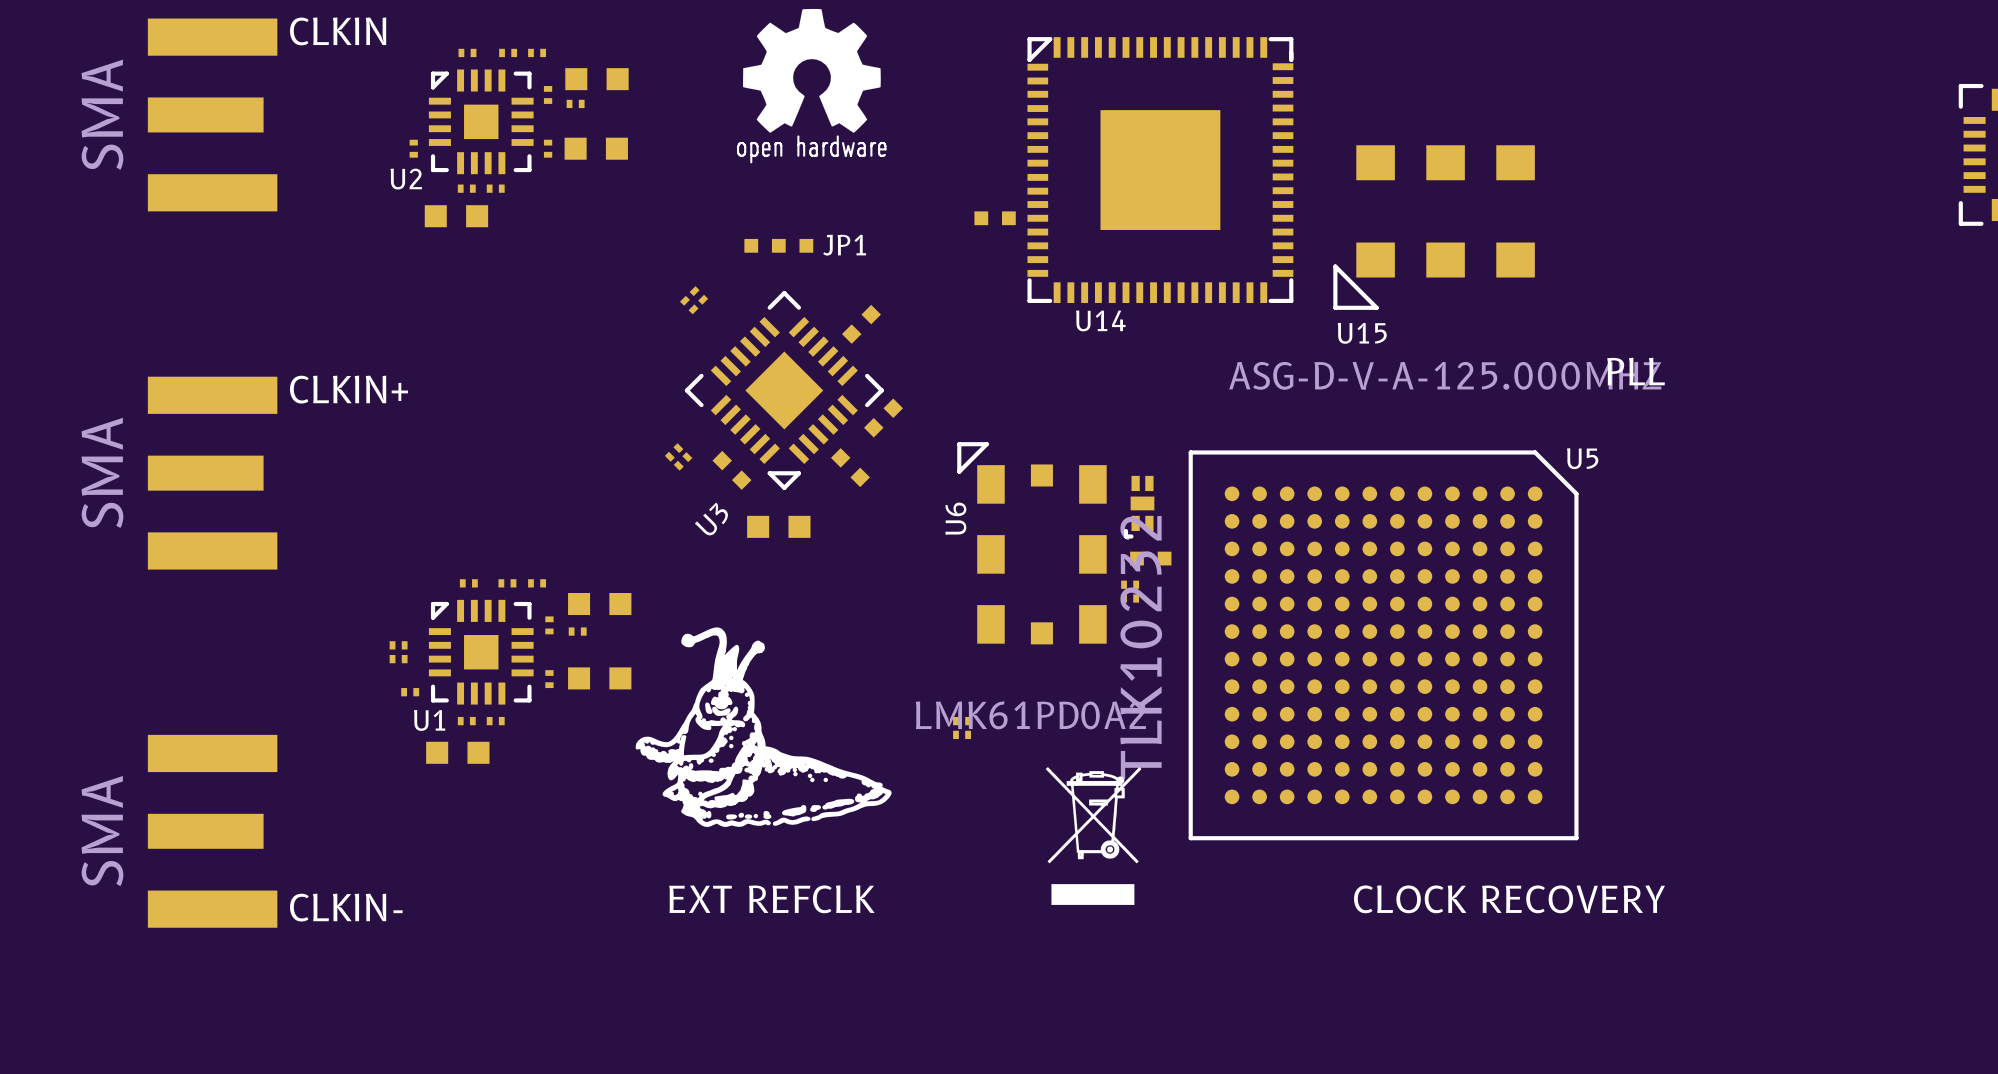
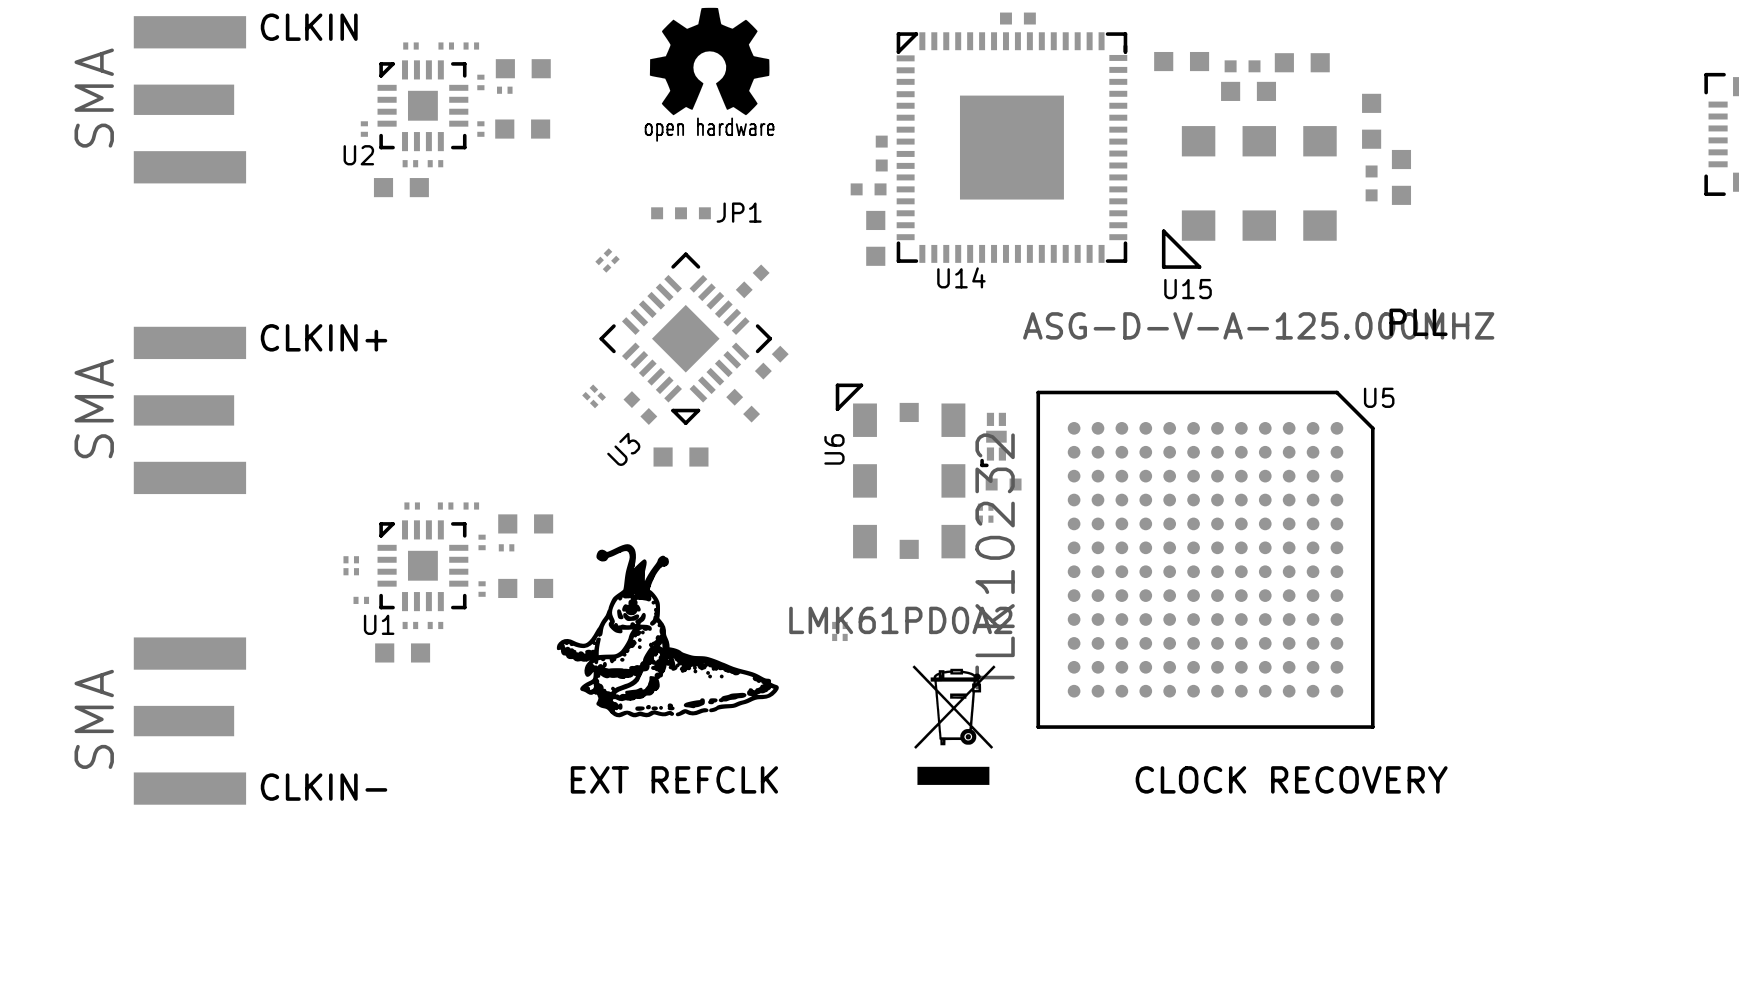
part: none -> (1017, 18)
part: none -> (1181, 61)
part: none -> (1302, 62)
part: none -> (1242, 66)
part: none -> (1248, 91)
part: none -> (1371, 121)
part: none -> (881, 153)
part: none -> (1401, 177)
part: none -> (1371, 183)
part: none -> (875, 238)

